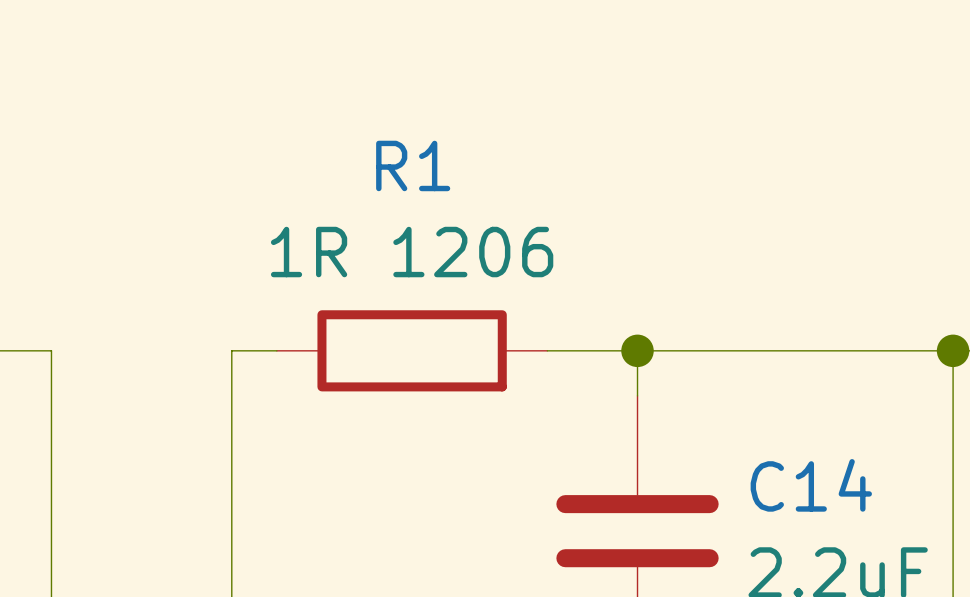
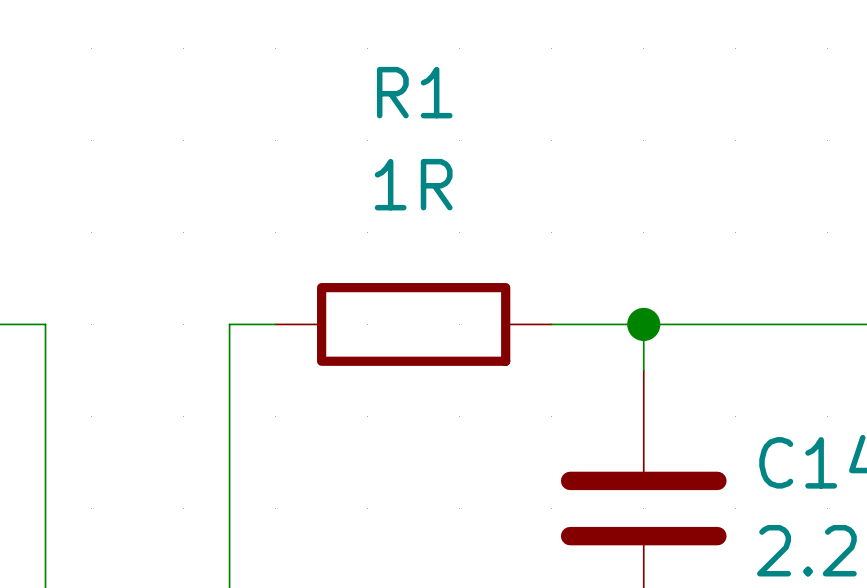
R1 name position: R1 (413, 165) -> R1 (414, 92)
R1 value: 1R 1206 (412, 252) -> 1R (413, 184)

